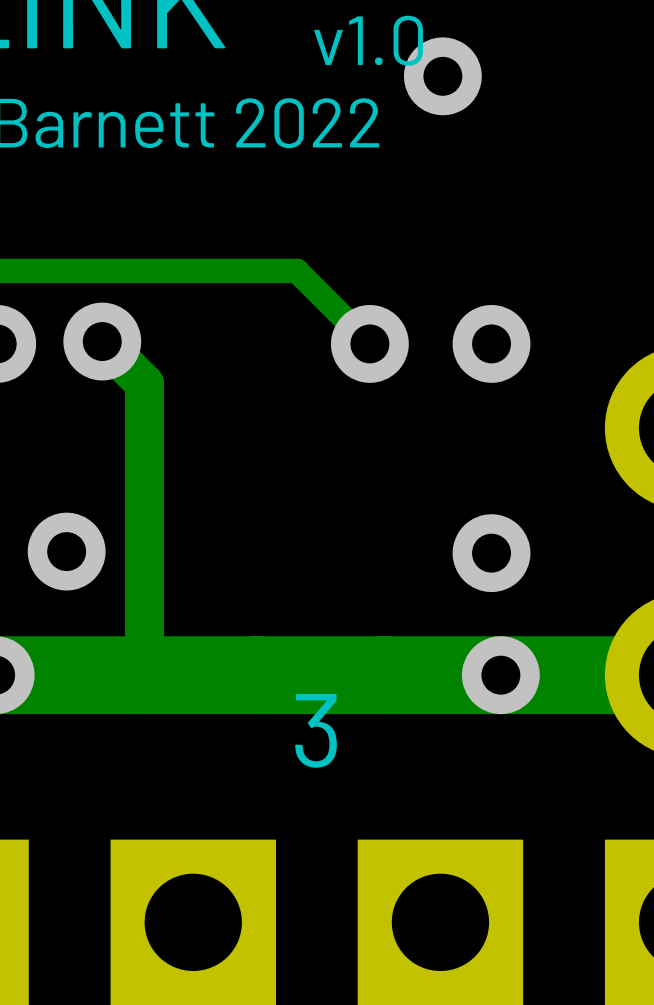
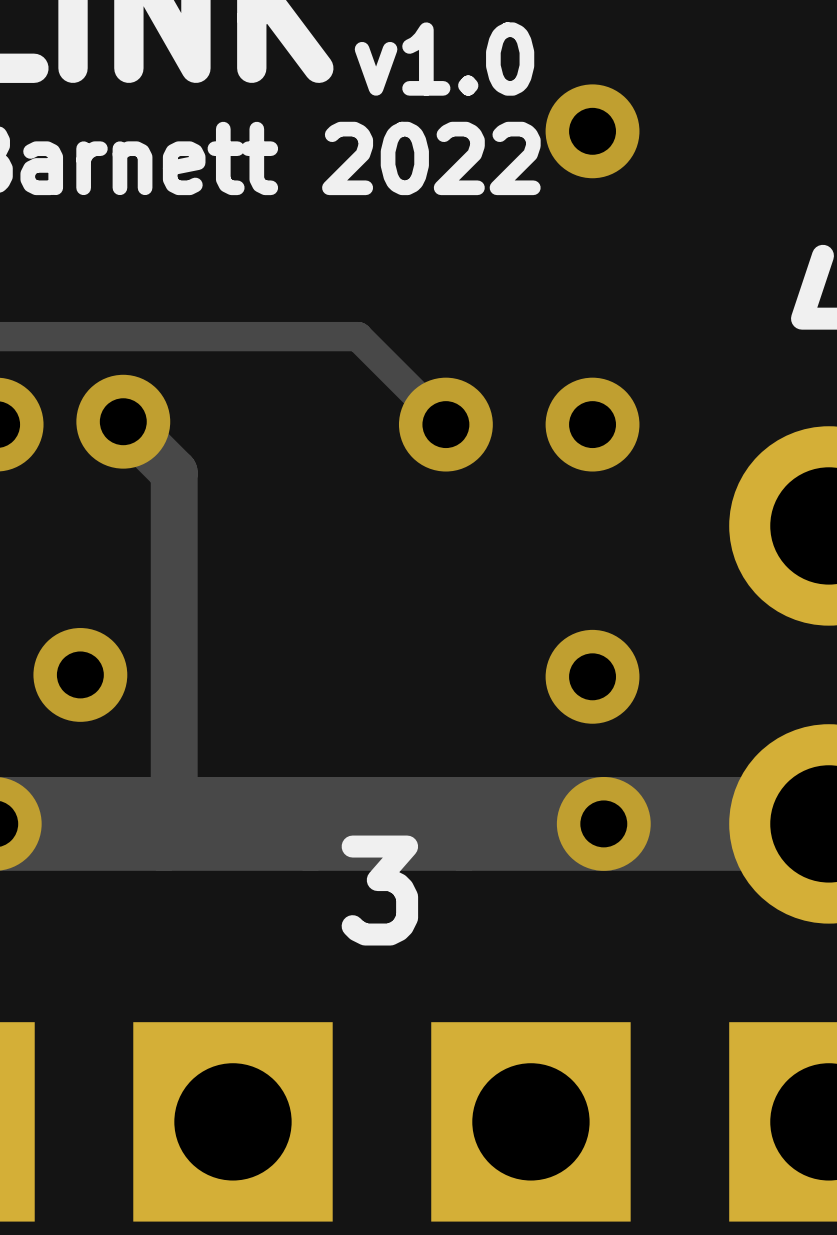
via position: (442, 76) -> (592, 131)

